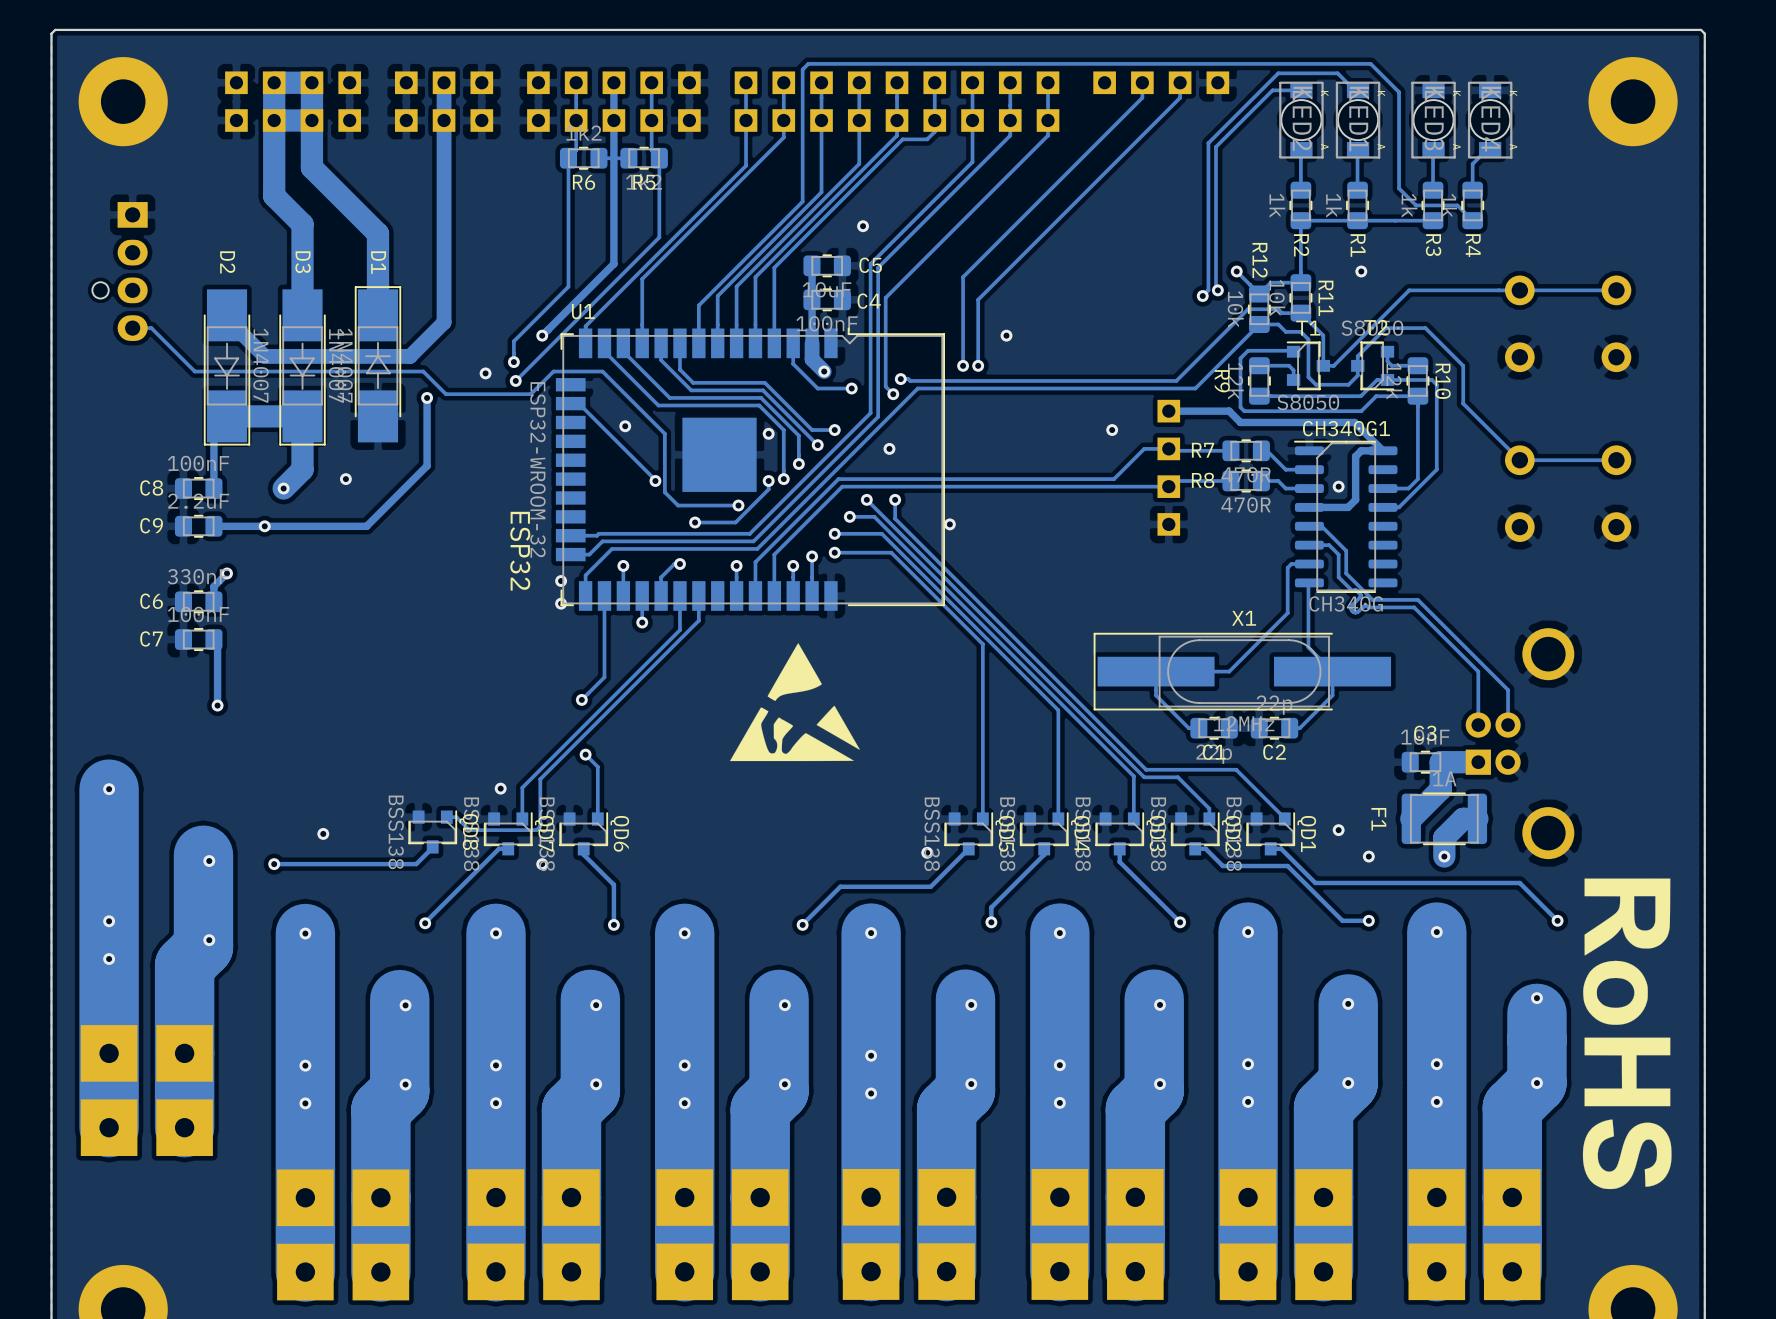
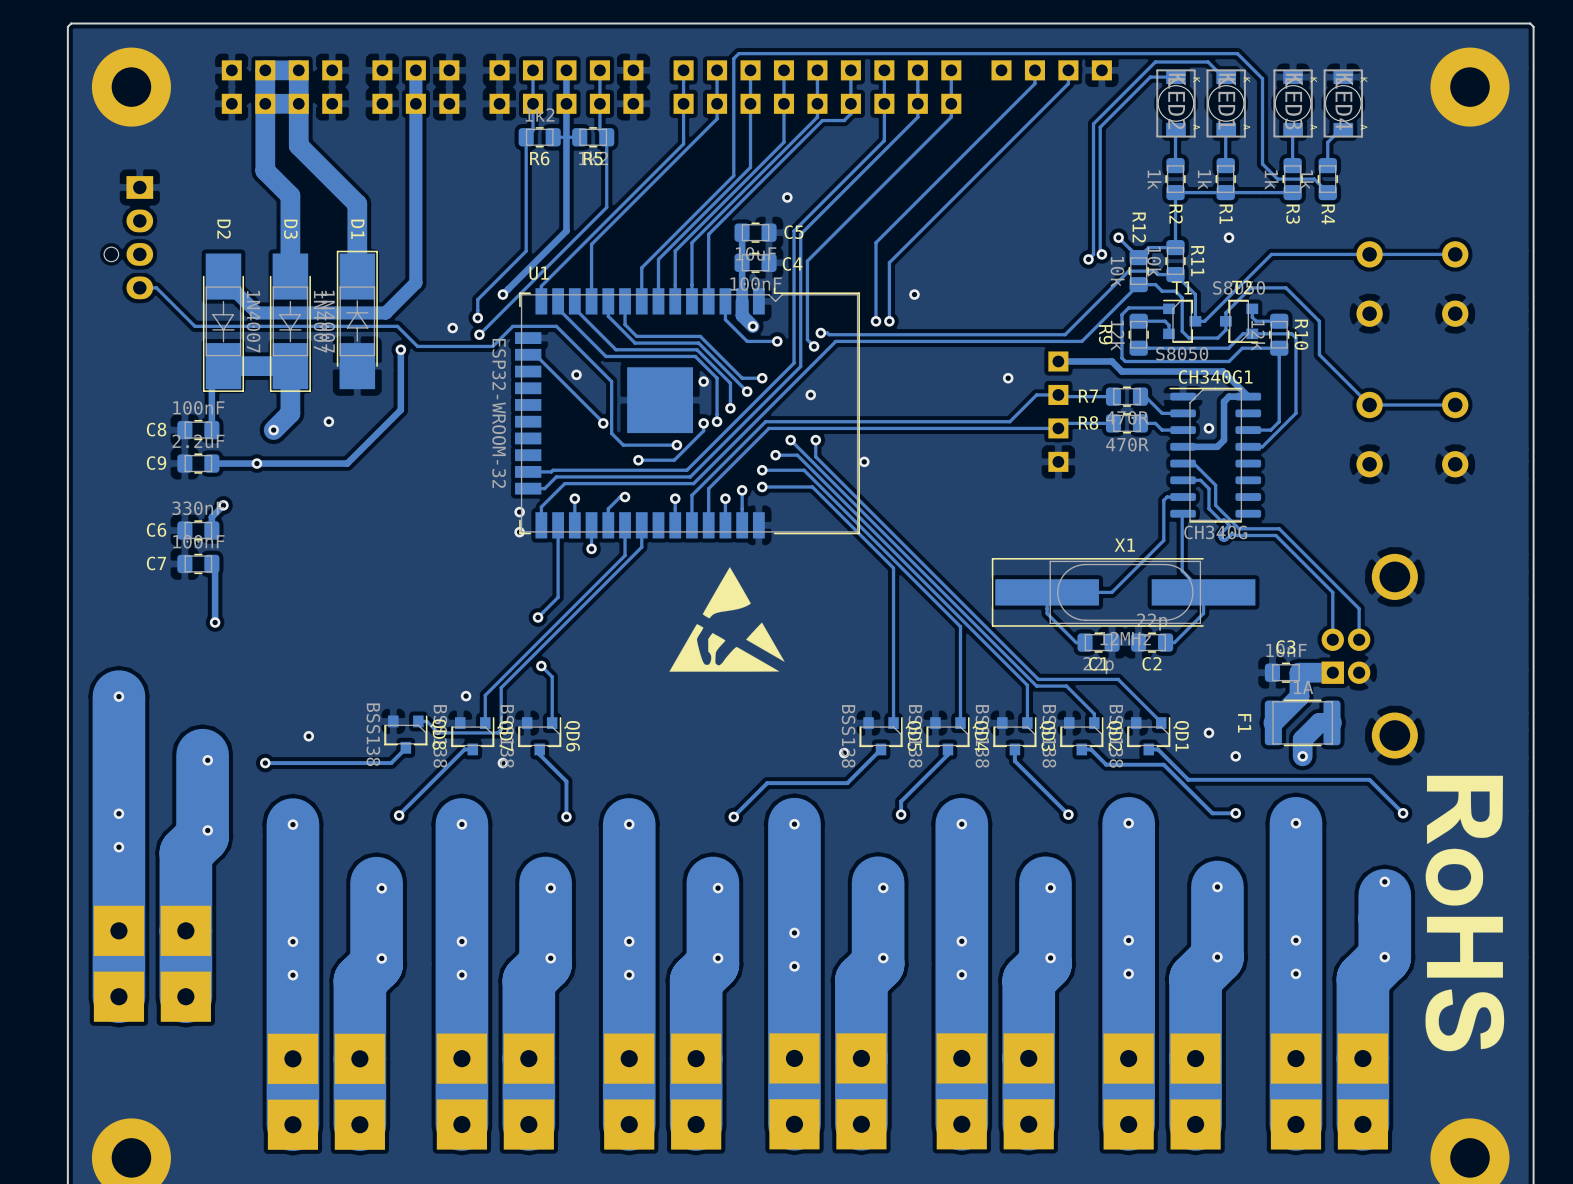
text: ESP32 (520, 551) -> none

